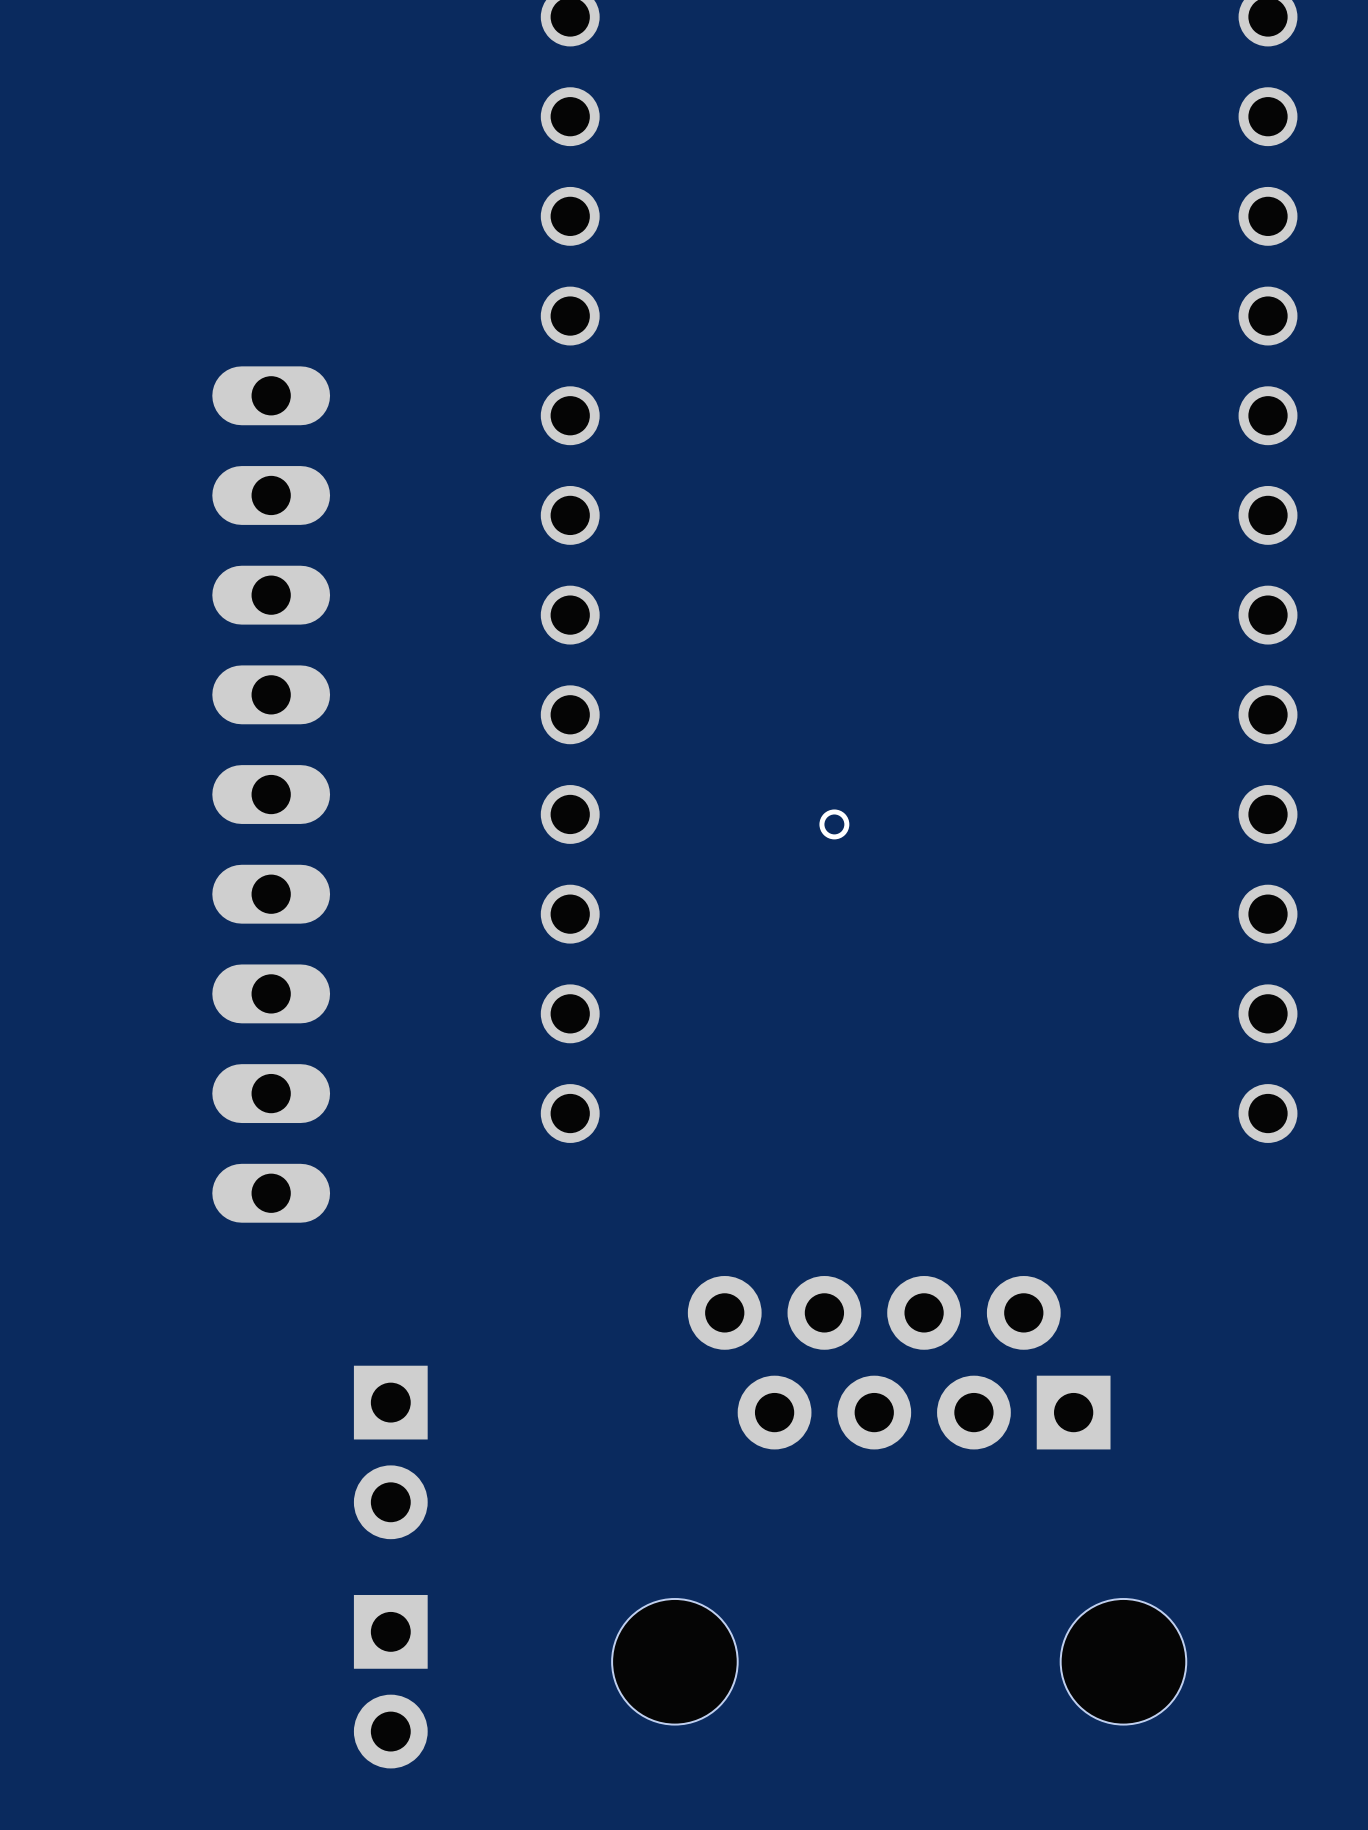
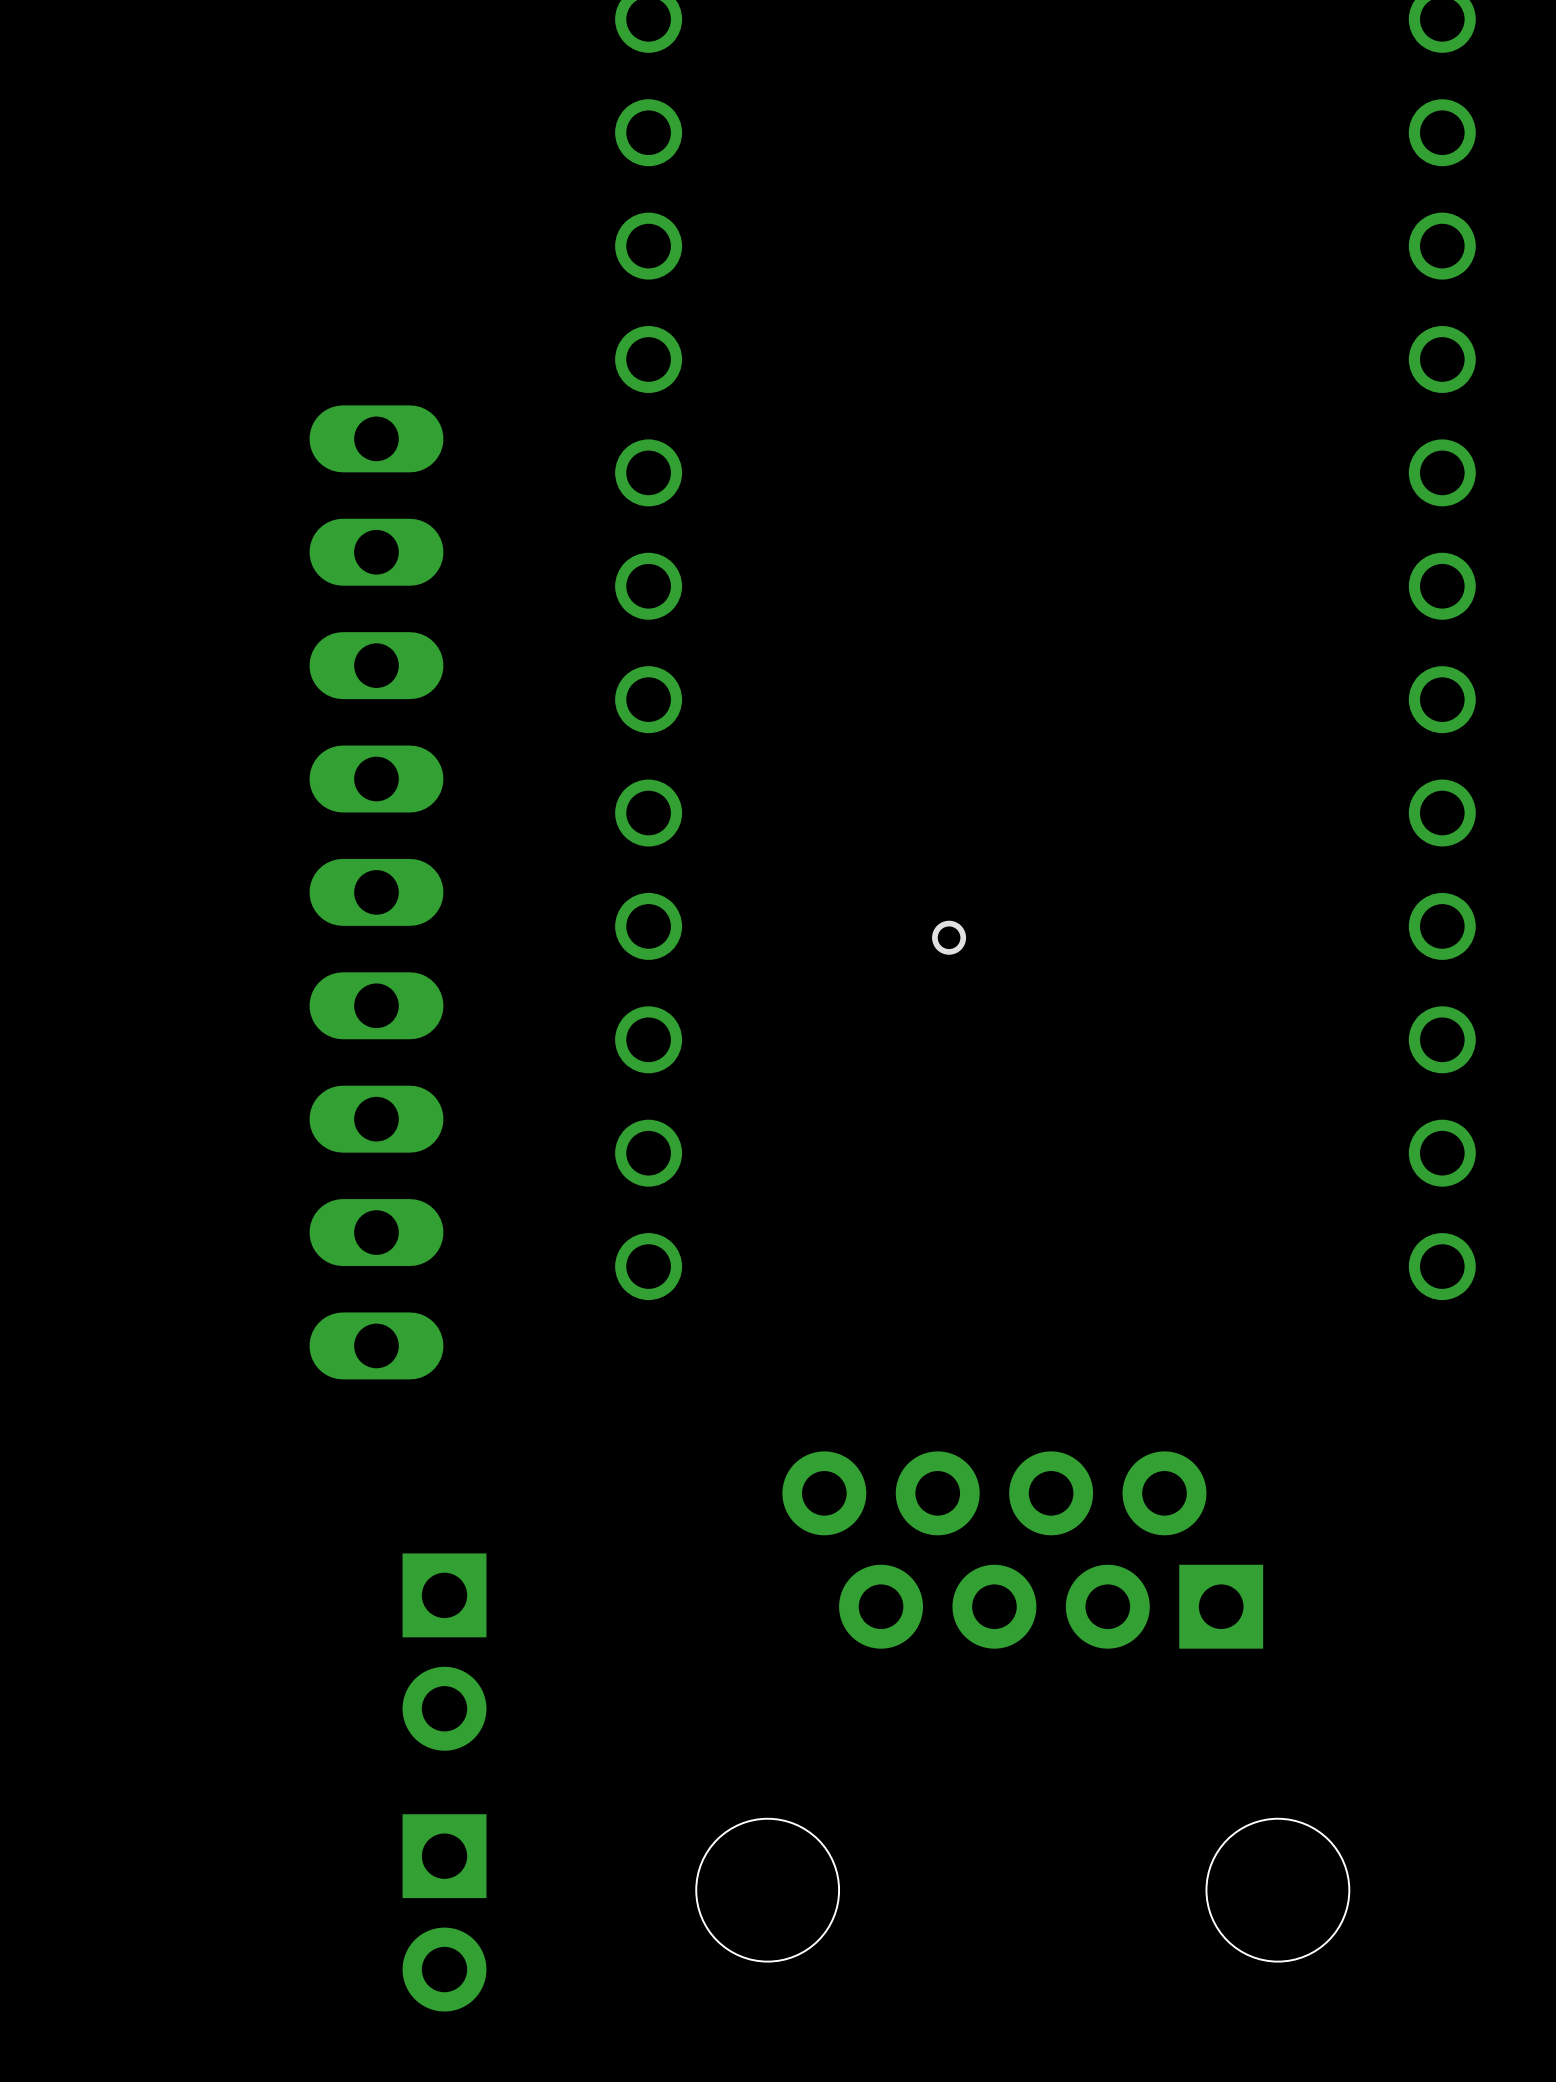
part position: (271, 794) -> (376, 892)

